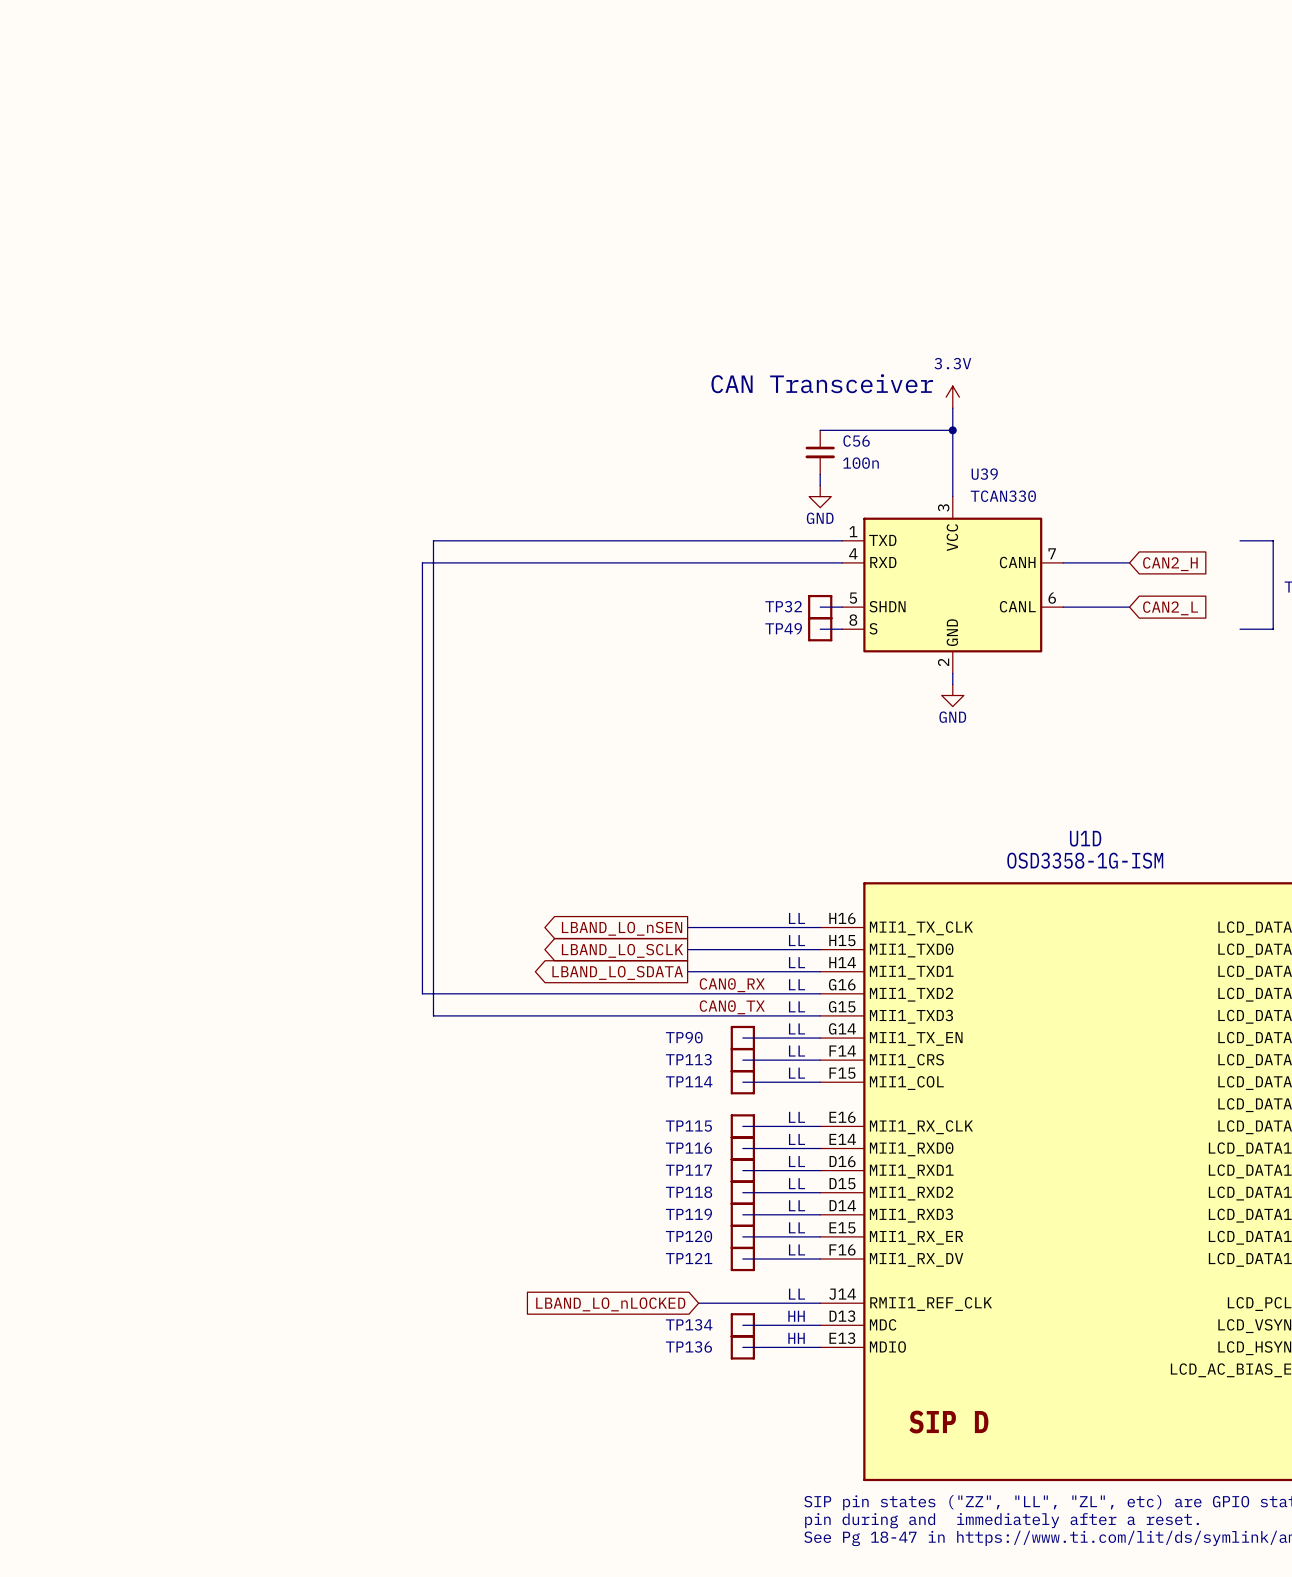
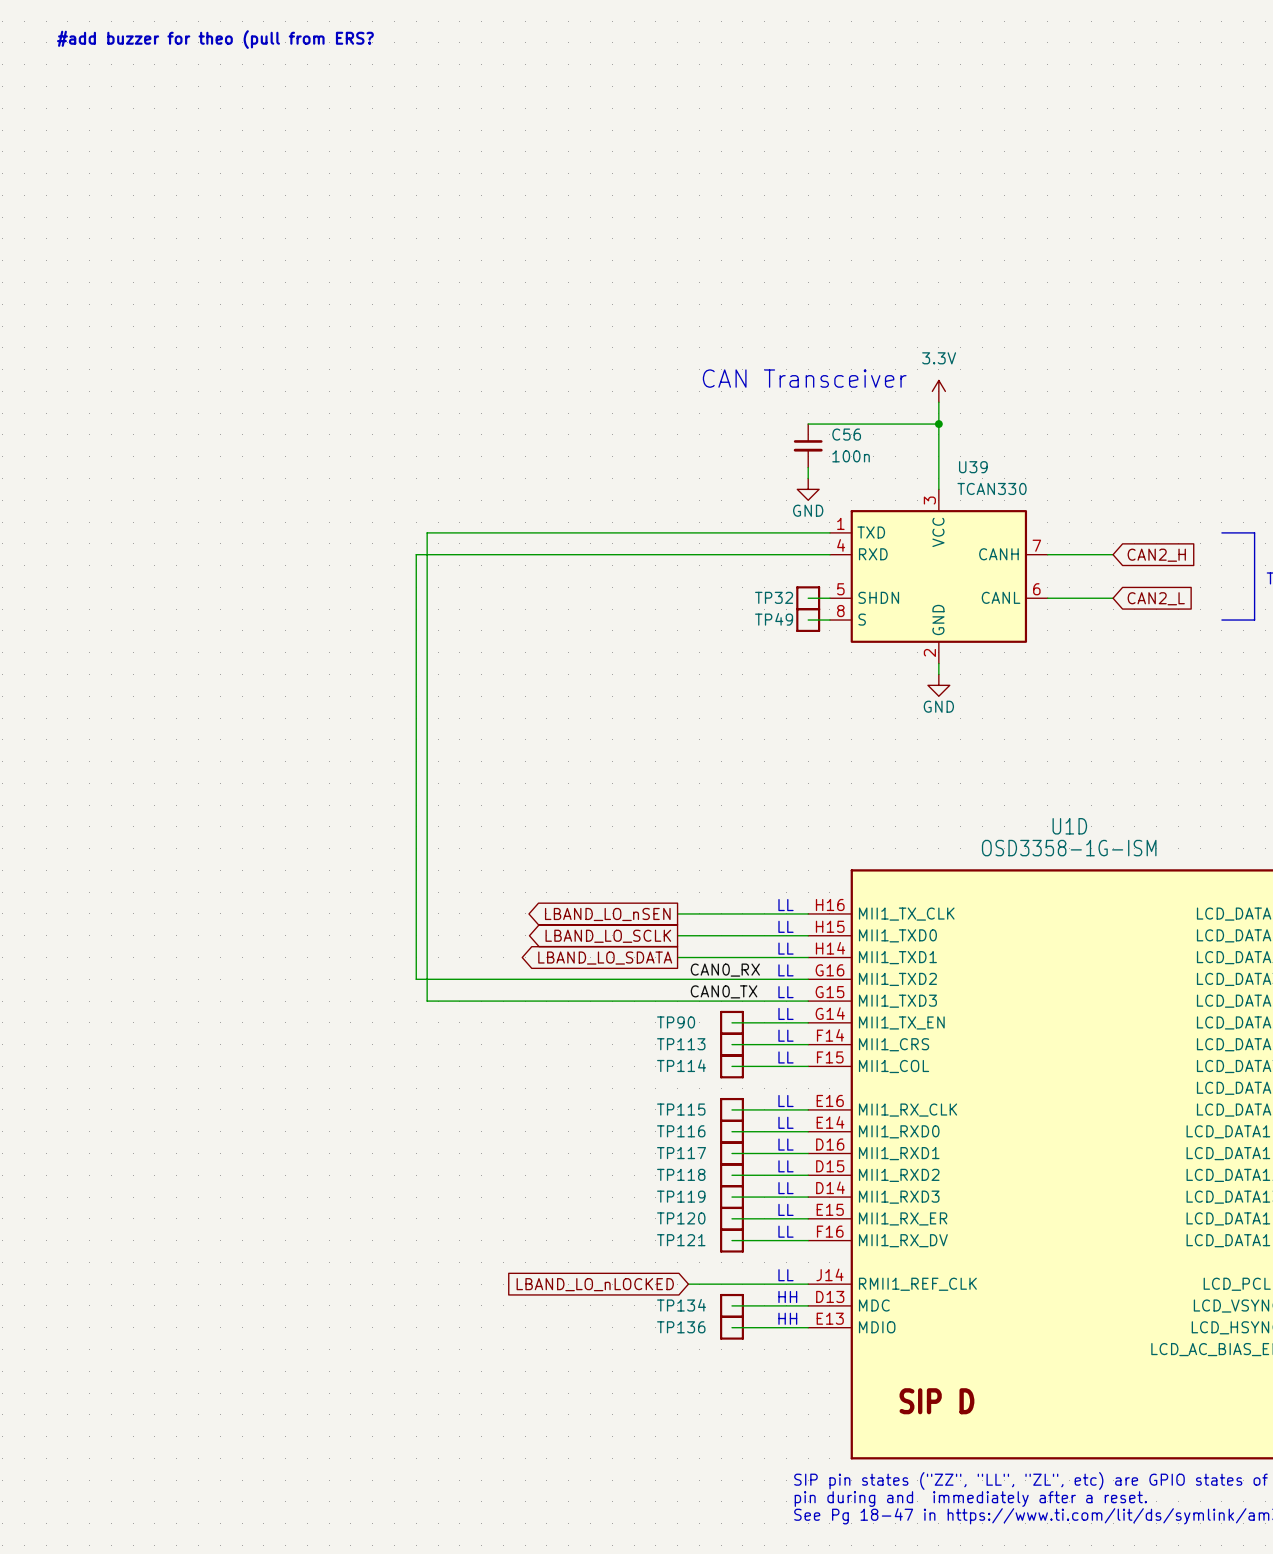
text: none -> #add buzzer for theo (pull from ERS? (215, 39)

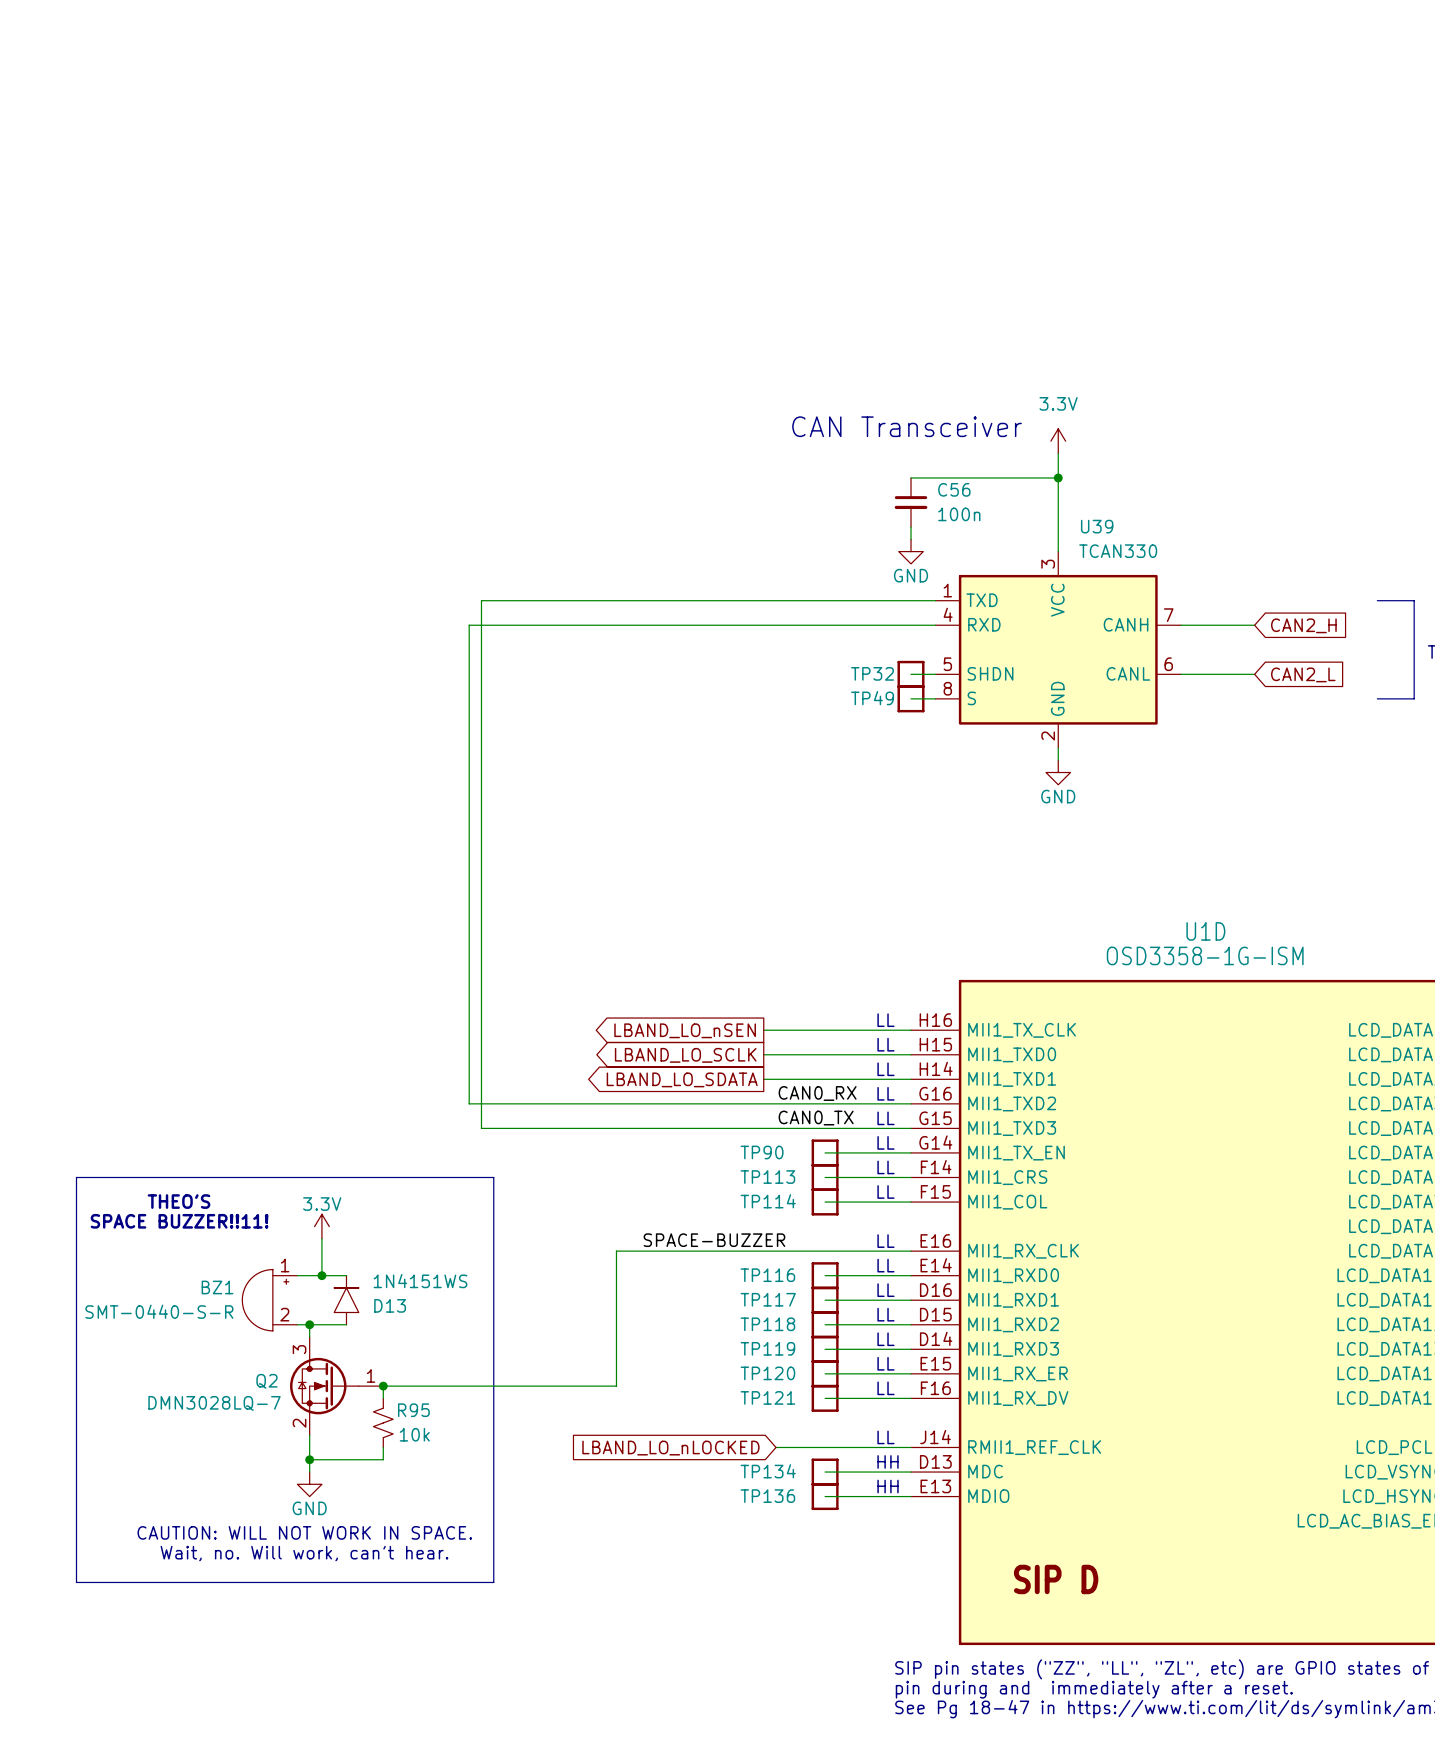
text: #add buzzer for theo (pull from ERS? (215, 39) -> none
line: none -> (76, 1177) (493, 1177) (493, 1582) (76, 1582) (76, 1177)
text: none -> THEO'S (179, 1201)
text: none -> SPACE BUZZER!!11! (179, 1221)
power symbol: none -> 3.3V (321, 1226)
wire: none -> (321, 1238) (321, 1275)
label: none -> SPACE-BUZZER (714, 1240)
wire: none -> (825, 1251) (616, 1251) (616, 1386) (383, 1386) (383, 1398)
TP115: (731, 1109) -> none
wire: none -> (297, 1275) (346, 1275)
junction: none -> (321, 1275)
BZ1: none -> SMT-0440-S-R (269, 1300)
D13: none -> 1N4151WS (346, 1300)
wire: none -> (297, 1324) (346, 1324)
wire: none -> (309, 1324) (309, 1337)
junction: none -> (309, 1324)
Q2: none -> DMN3028LQ-7 (336, 1386)
junction: none -> (383, 1386)
R95: none -> 10k (383, 1422)
wire: none -> (309, 1435) (309, 1472)
wire: none -> (383, 1447) (383, 1459) (309, 1459)
junction: none -> (309, 1459)
power symbol: none -> GND (309, 1484)
text: none -> CAUTION: WILL NOT WORK IN SPACE. (304, 1532)
text: none -> Wait, no. Will work, can't hear. (304, 1553)

